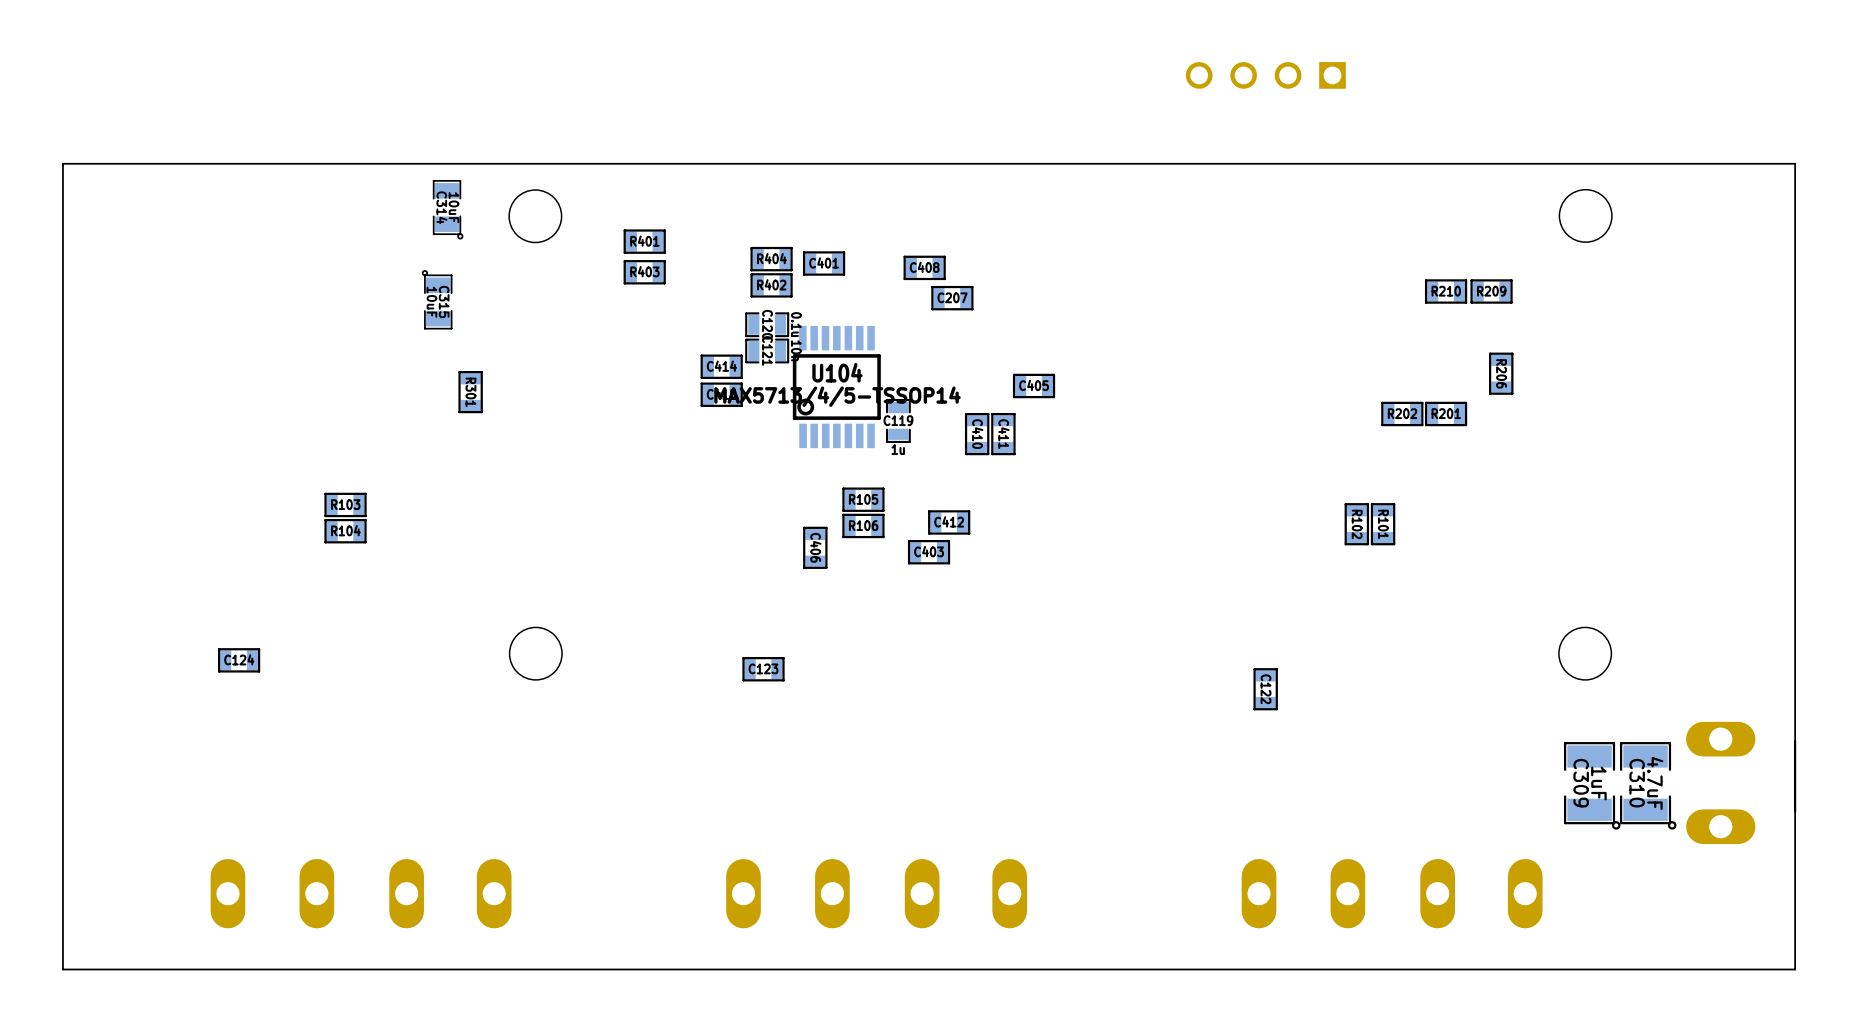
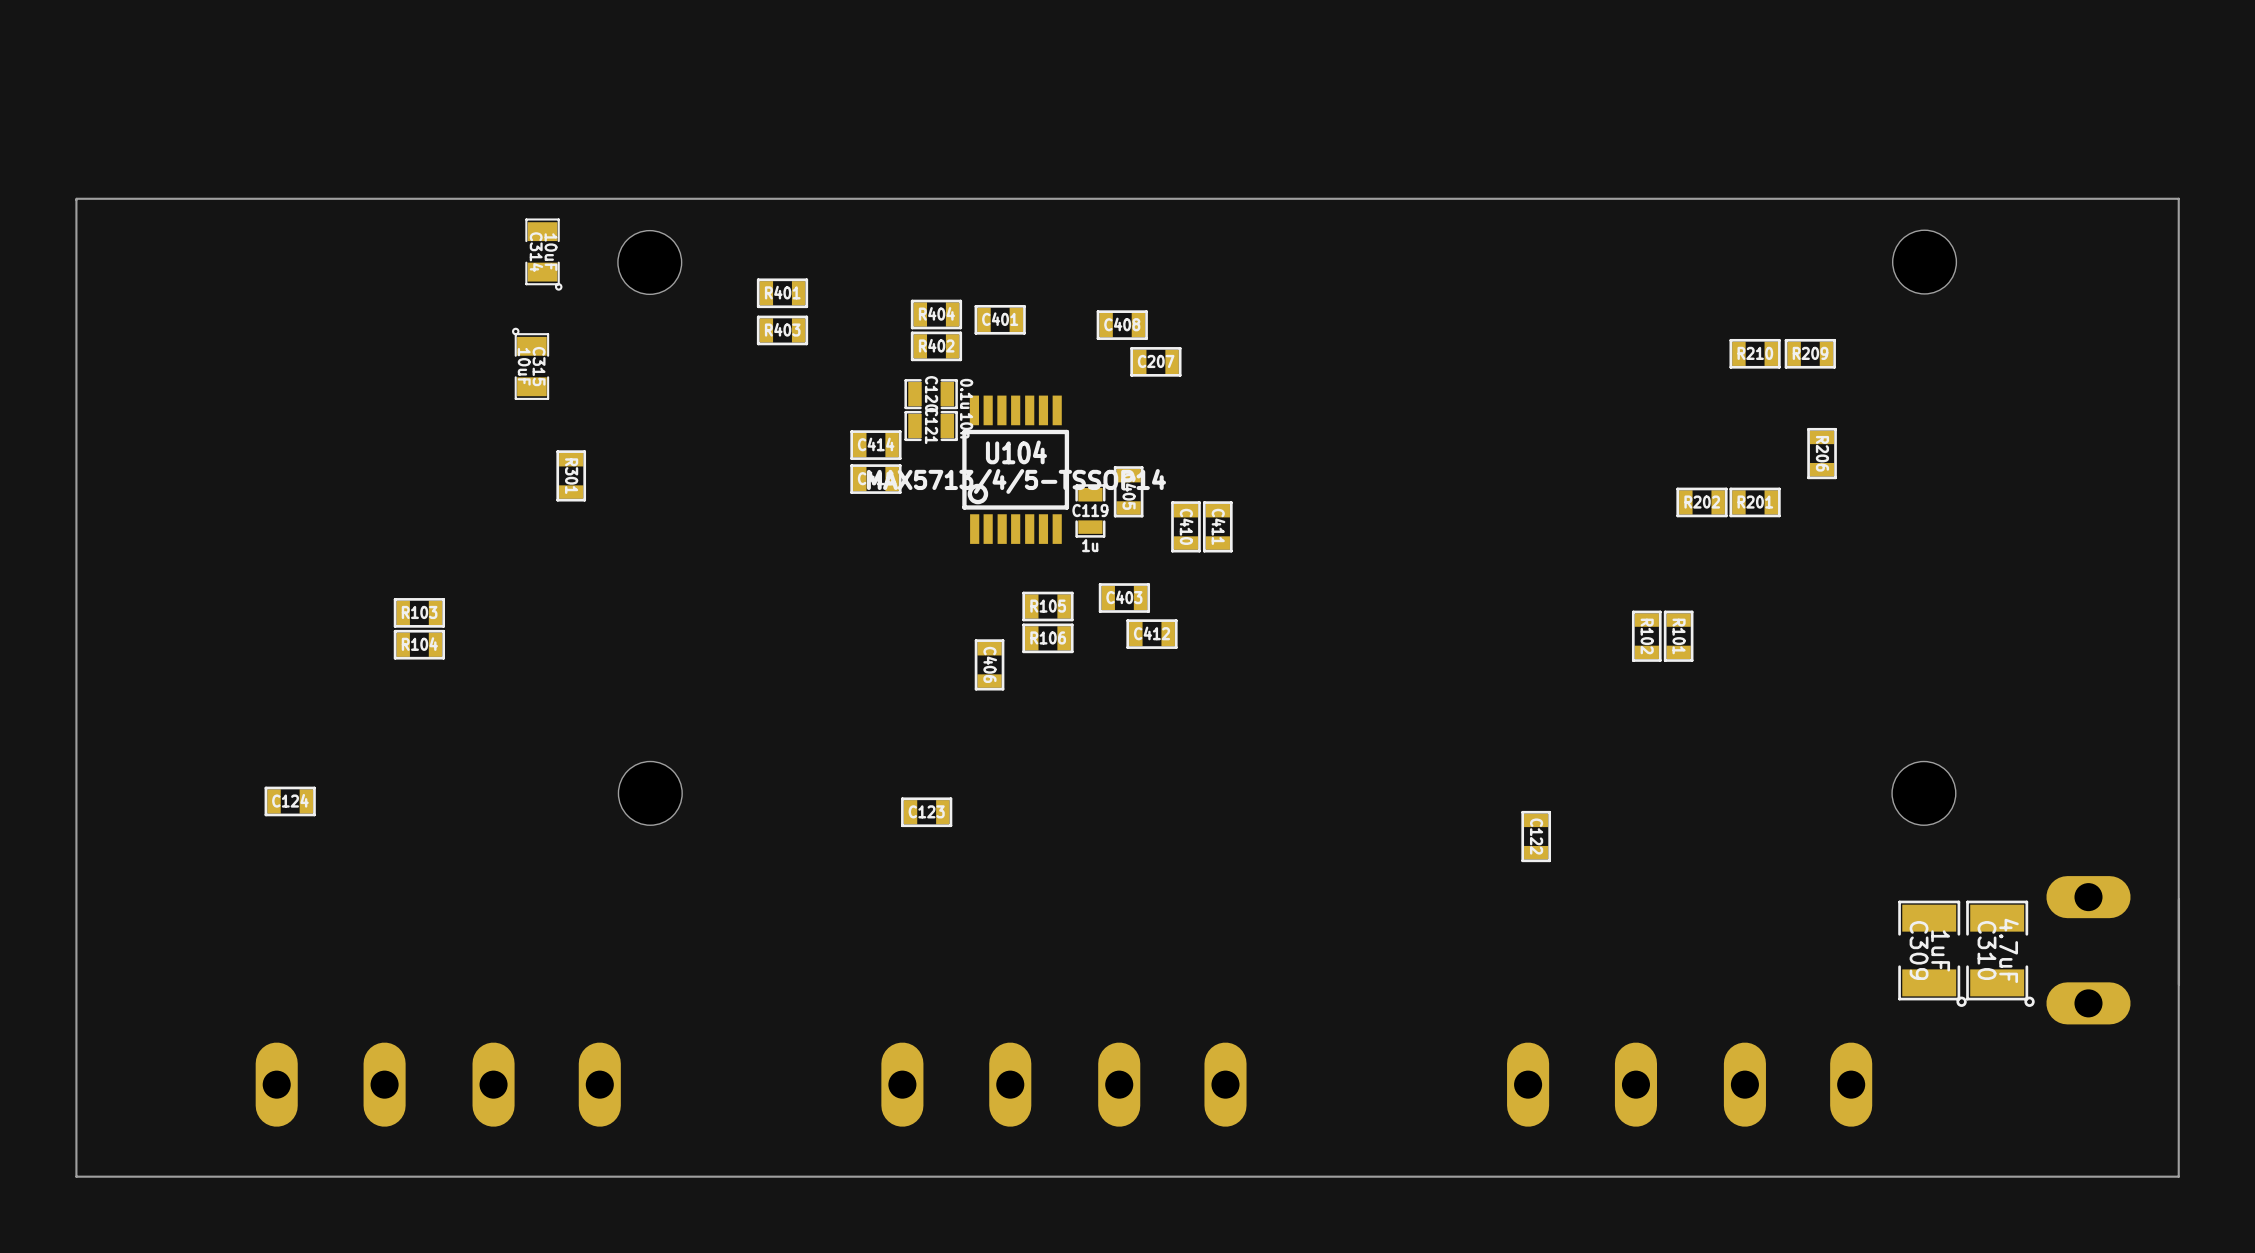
part: (1265, 75) -> none
C405 rotation: 0° (1034, 385) -> 90° clockwise (1128, 491)
C405 position: (1034, 385) -> (1128, 491)
C403 position: (929, 552) -> (1124, 598)

